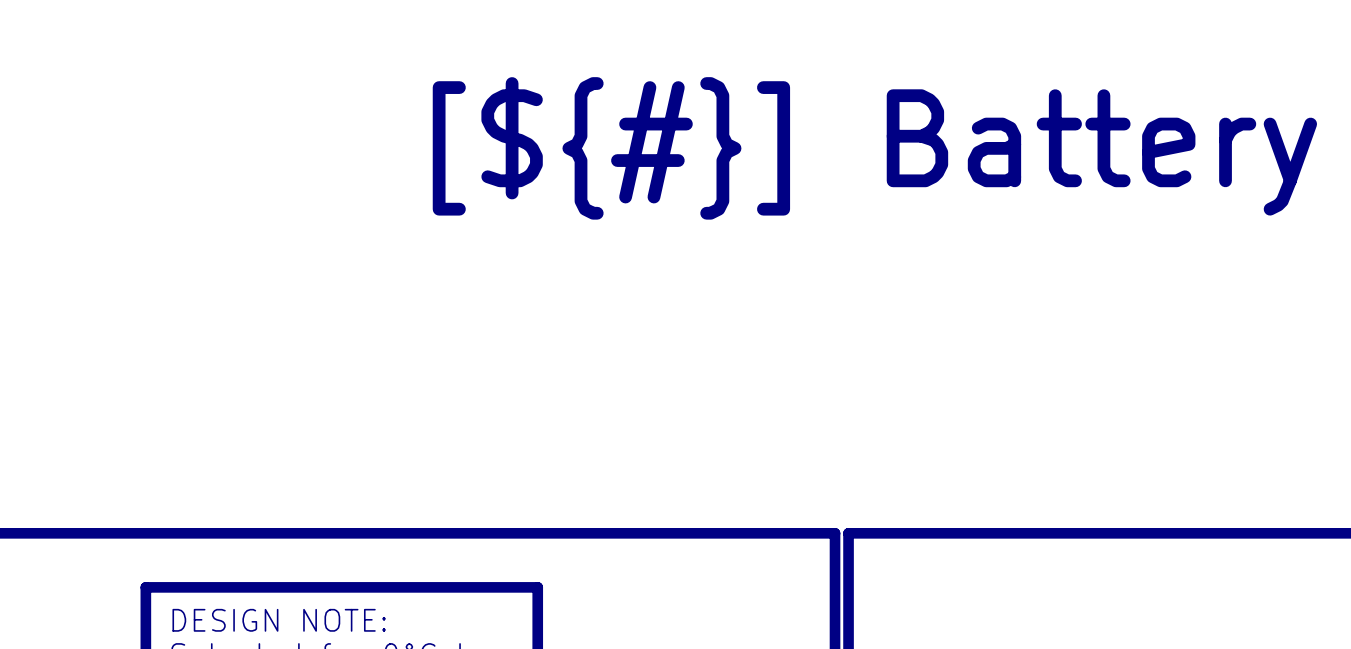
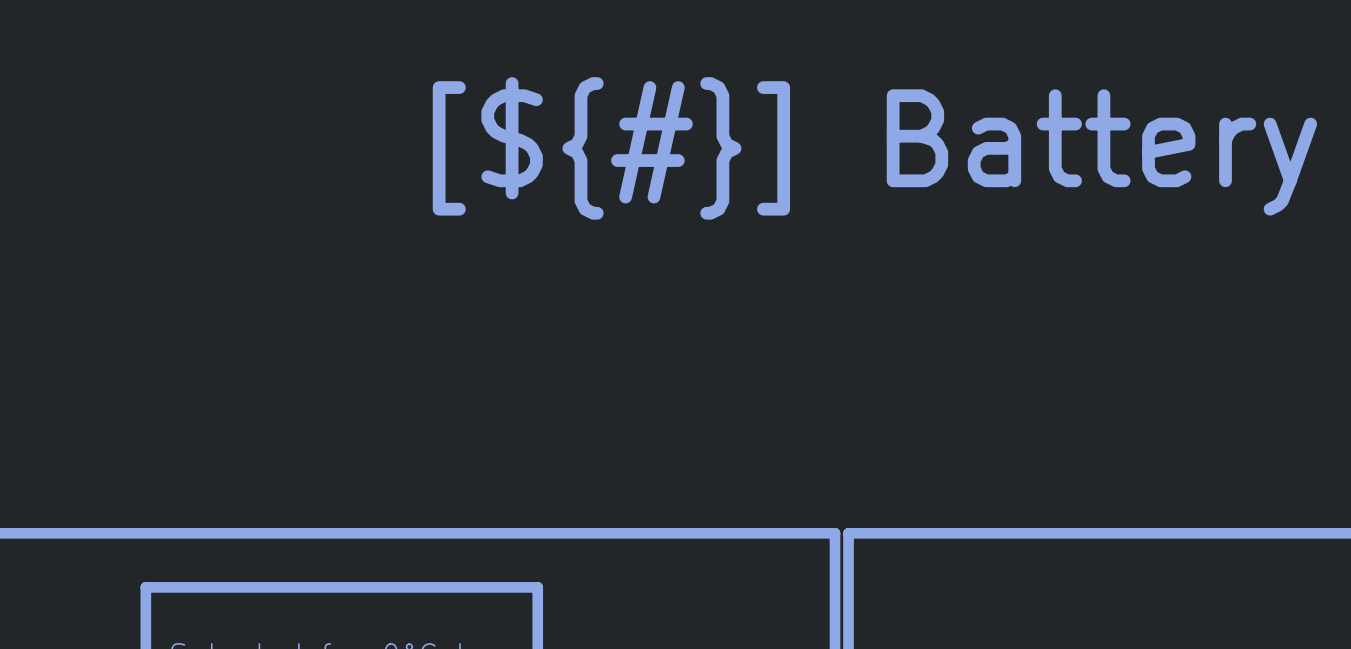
text: DESIGN NOTE: (279, 620) -> none

